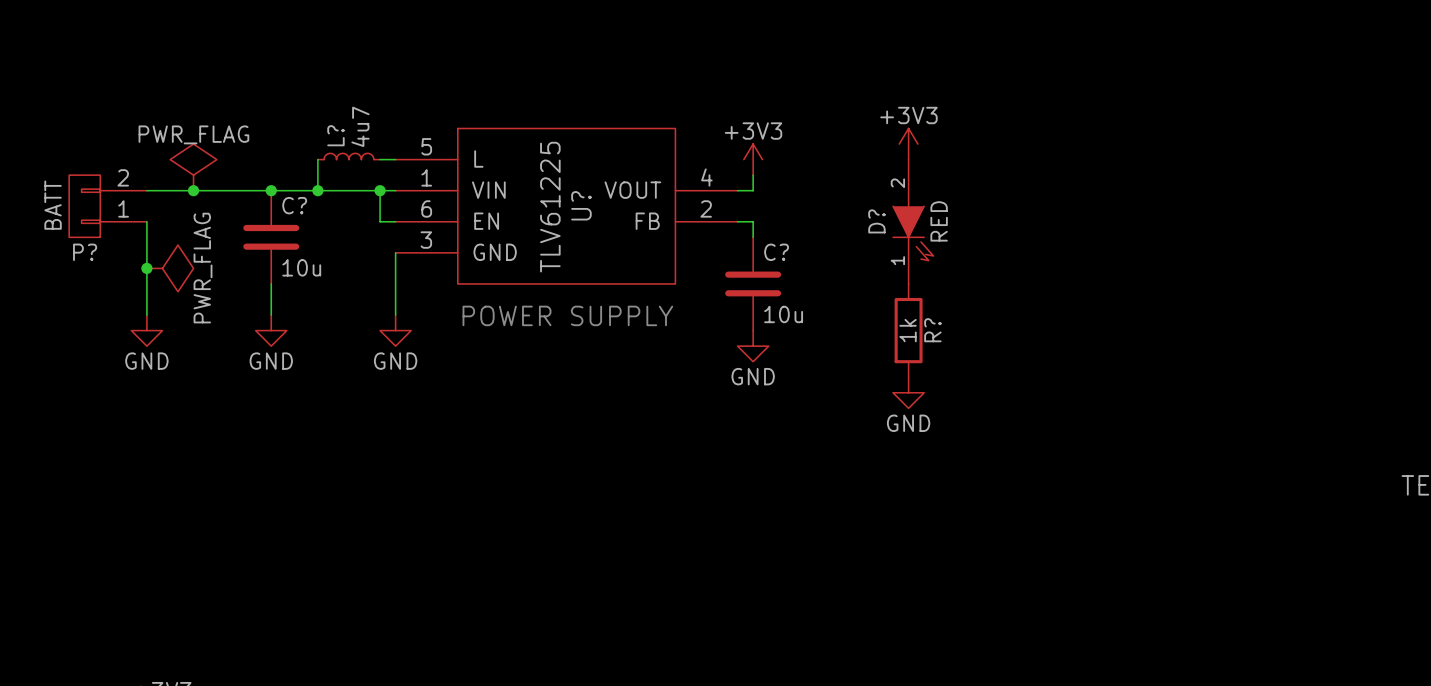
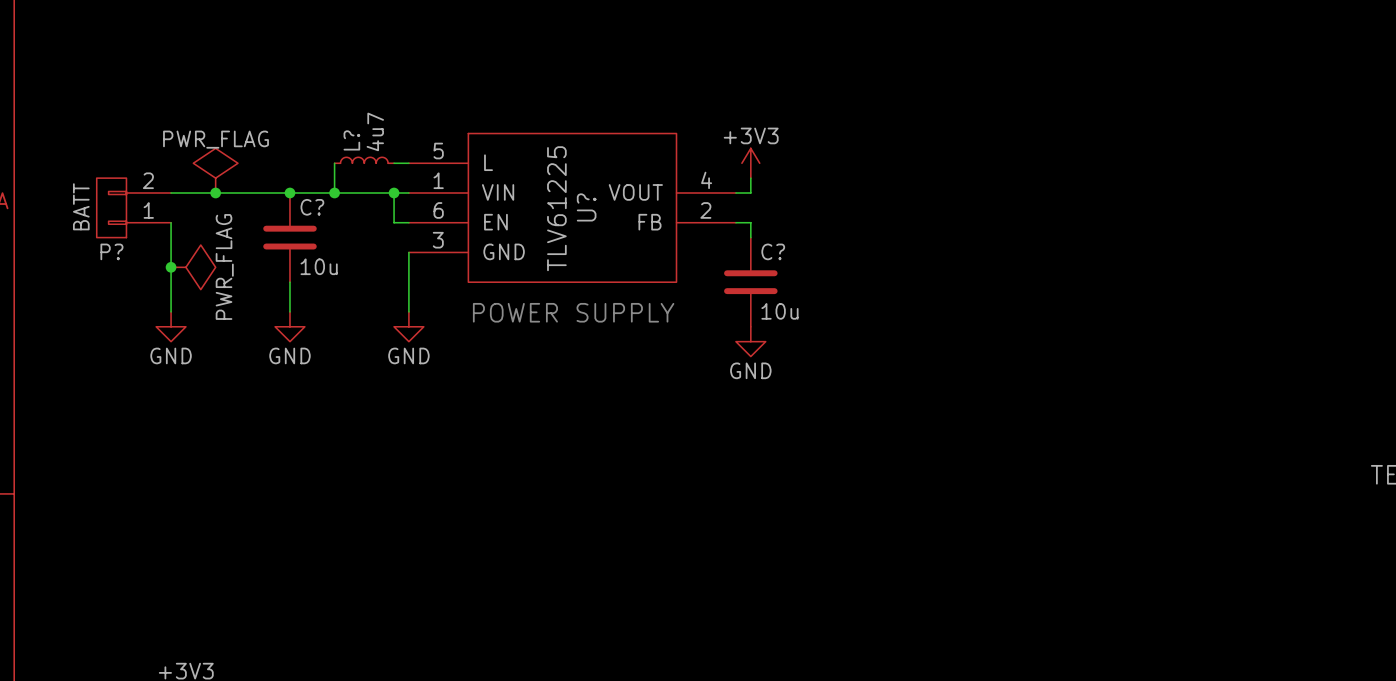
power symbol: +3V3 (908, 144) -> none
D?: RED (913, 221) -> none
R?: 1k (908, 330) -> none
power symbol: GND (908, 392) -> none

